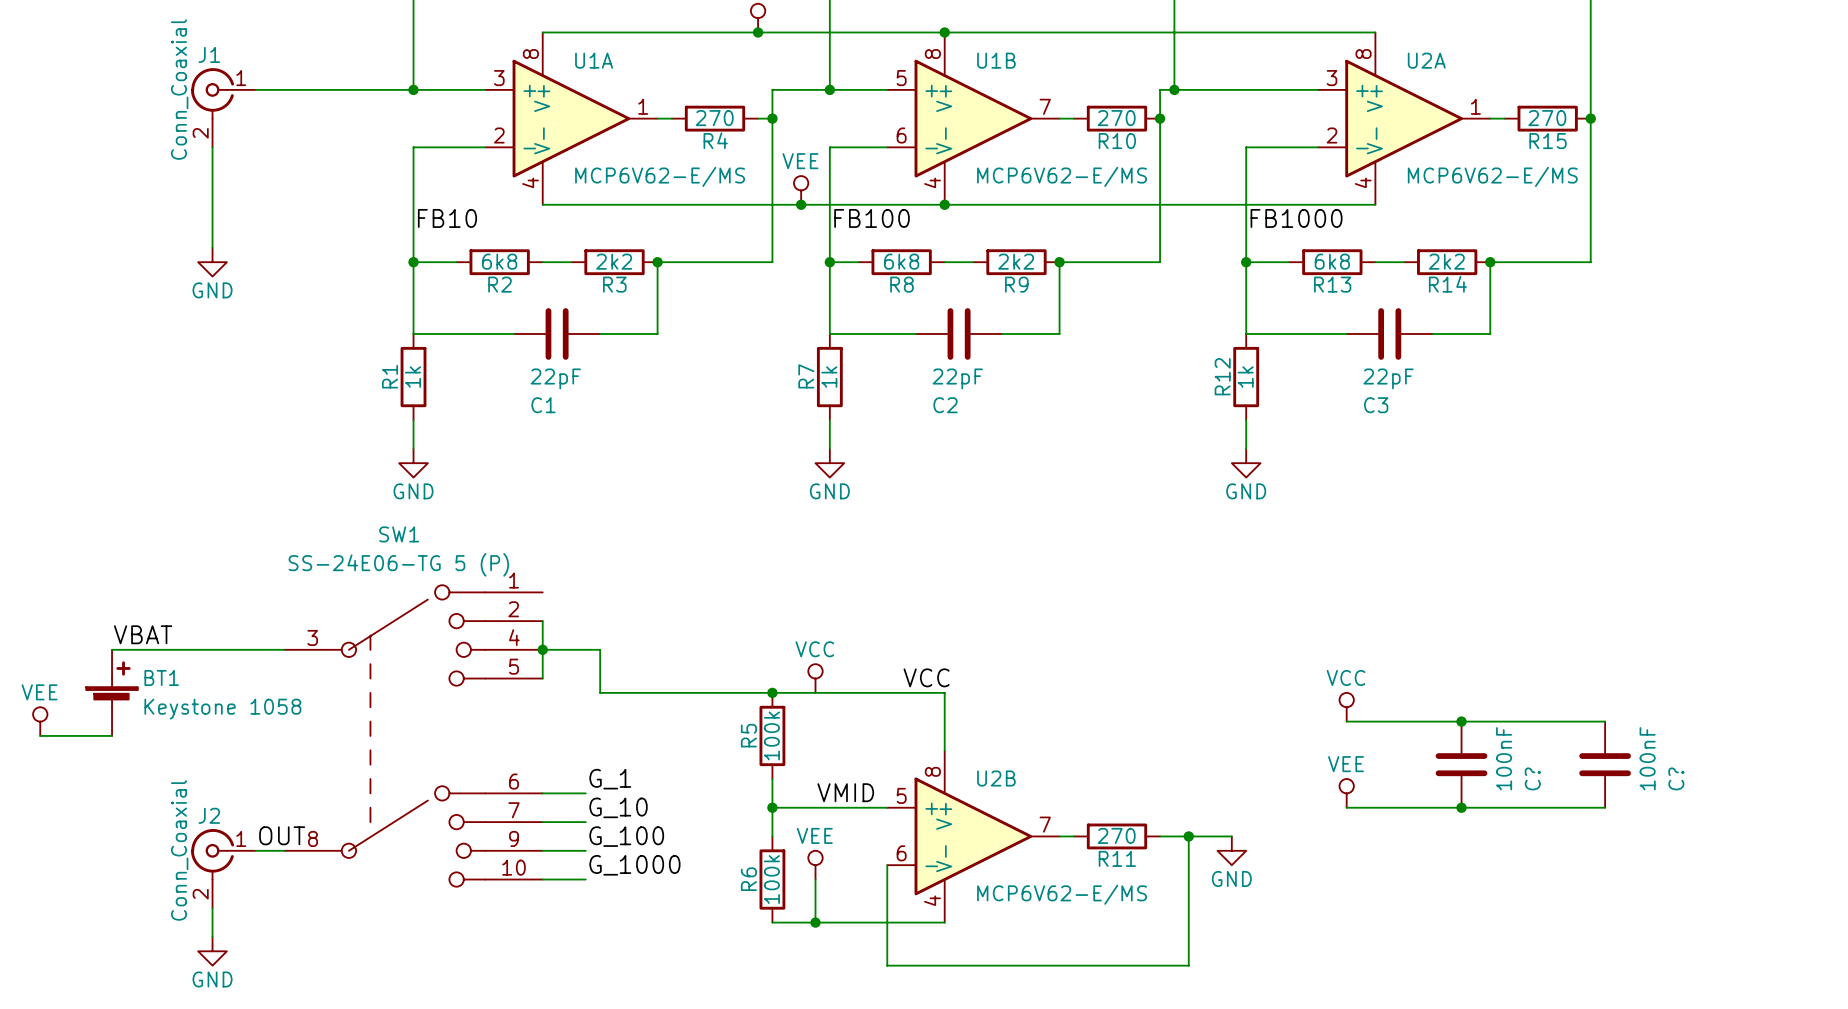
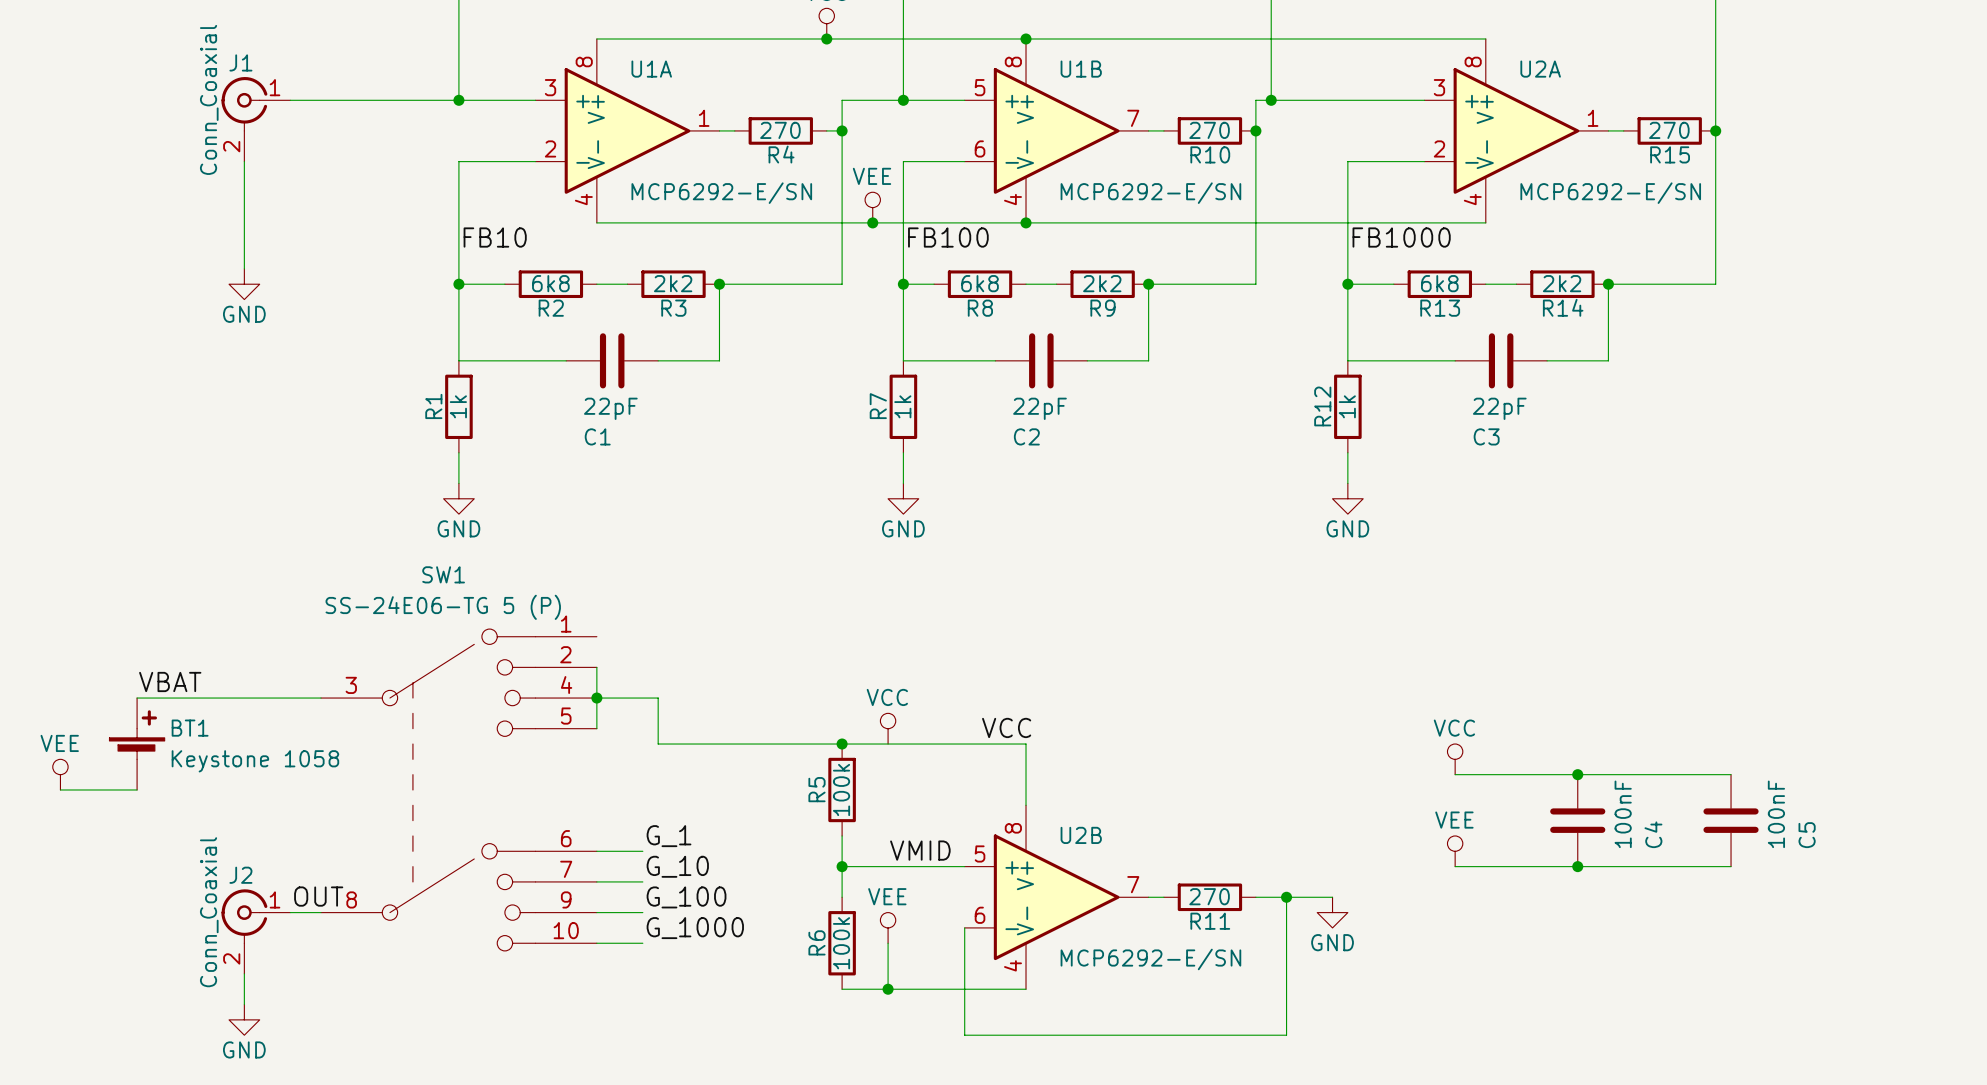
U1A value: MCP6V62-E/MS (660, 176) -> MCP6292-E/SN (721, 193)
U1B value: MCP6V62-E/MS (1062, 176) -> MCP6292-E/SN (1150, 193)
U2A value: MCP6V62-E/MS (1492, 176) -> MCP6292-E/SN (1610, 193)
C? name: C? (1532, 778) -> C4 (1653, 834)
C? name: C? (1676, 778) -> C5 (1807, 835)
U2B value: MCP6V62-E/MS (1062, 894) -> MCP6292-E/SN (1150, 959)

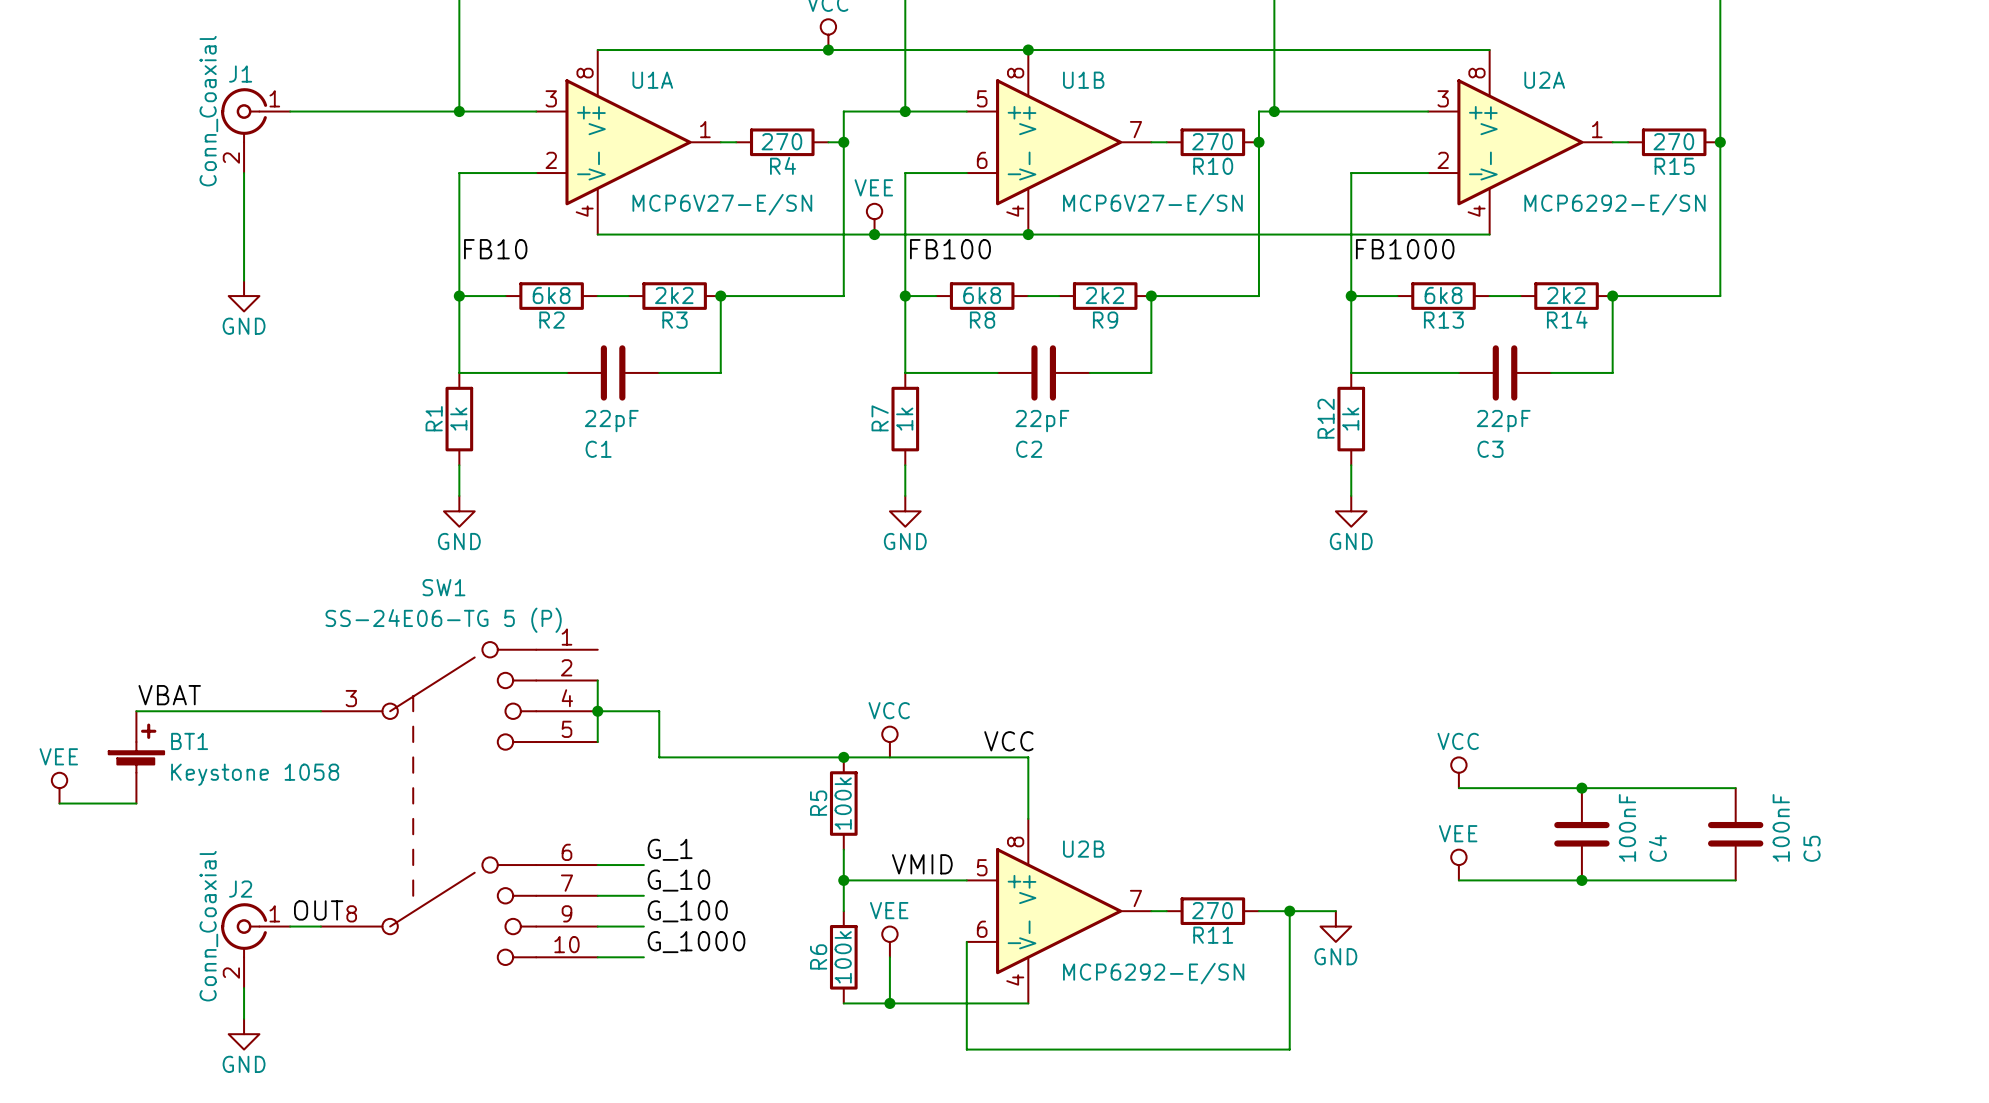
U1A value: MCP6292-E/SN (721, 193) -> MCP6V27-E/SN (722, 204)
U1B value: MCP6292-E/SN (1150, 193) -> MCP6V27-E/SN (1152, 204)

